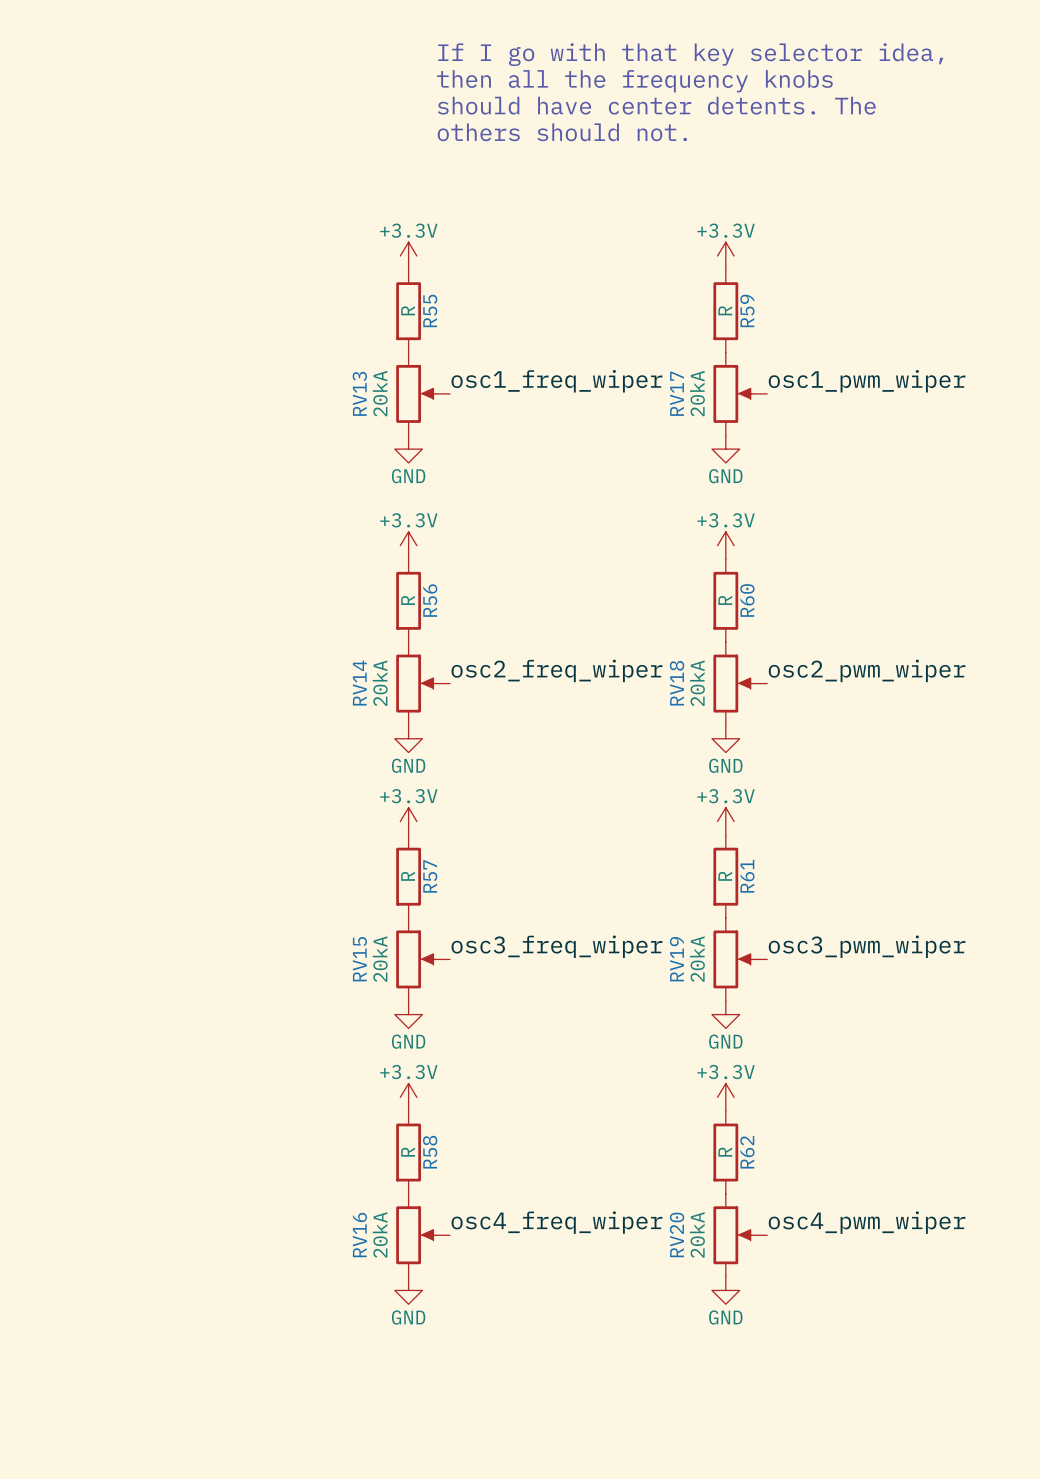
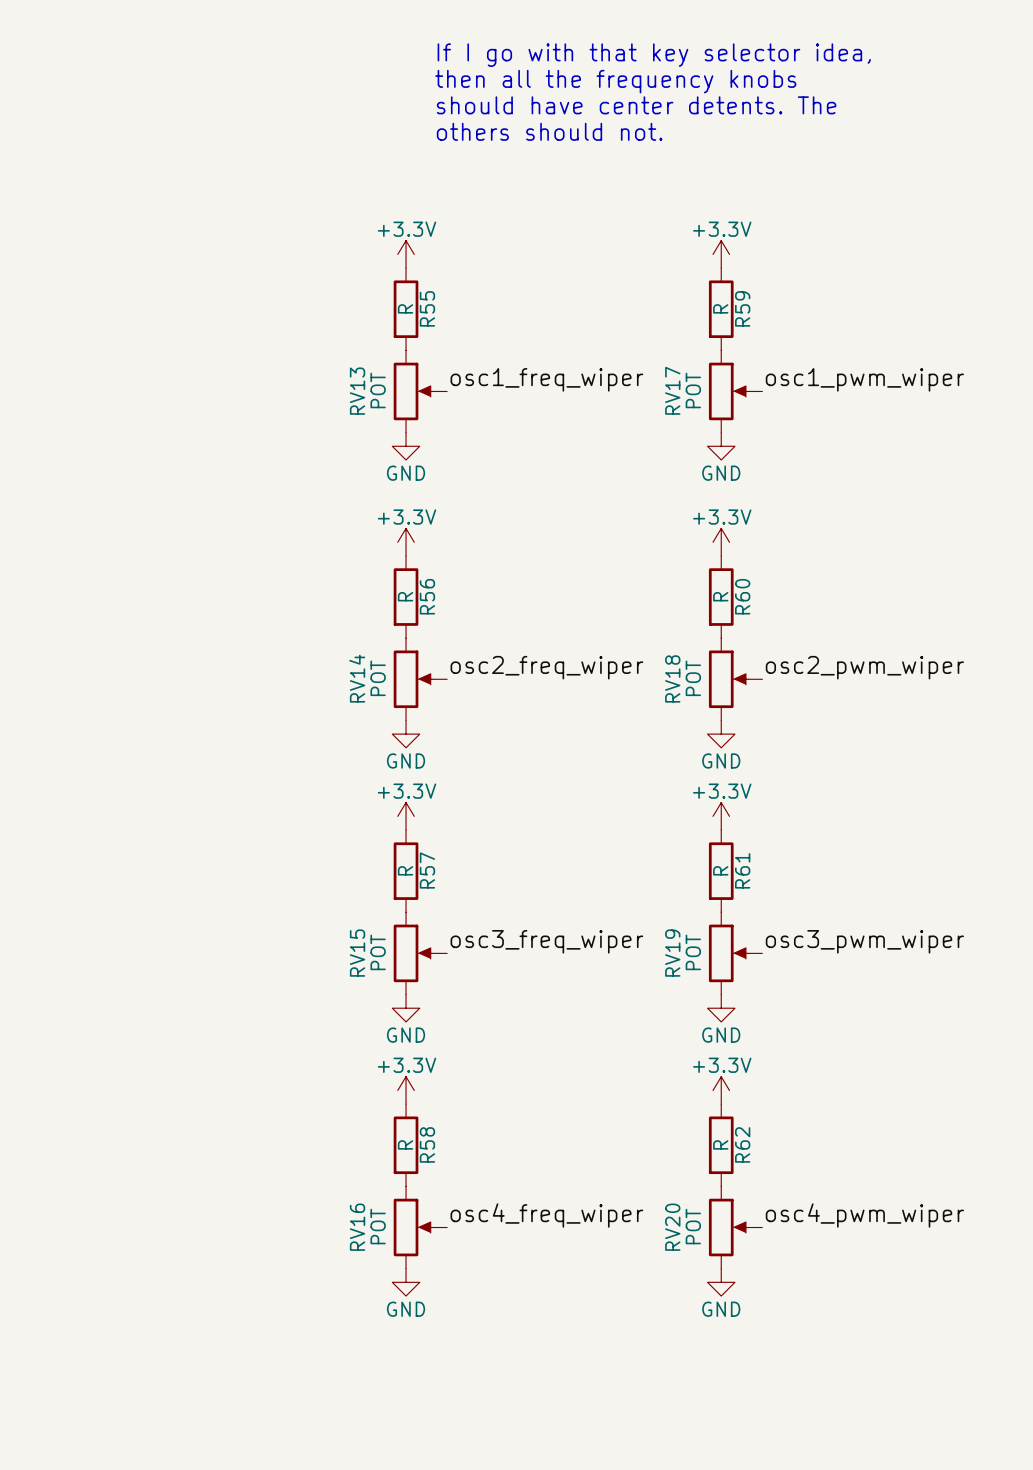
RV13 value: 20kA (380, 393) -> POT (378, 390)
RV17 value: 20kA (697, 393) -> POT (693, 390)
RV14 value: 20kA (380, 683) -> POT (378, 678)
RV18 value: 20kA (697, 683) -> POT (693, 678)
RV15 value: 20kA (380, 959) -> POT (378, 952)
RV19 value: 20kA (697, 959) -> POT (693, 952)
RV16 value: 20kA (380, 1234) -> POT (378, 1226)
RV20 value: 20kA (697, 1234) -> POT (693, 1226)

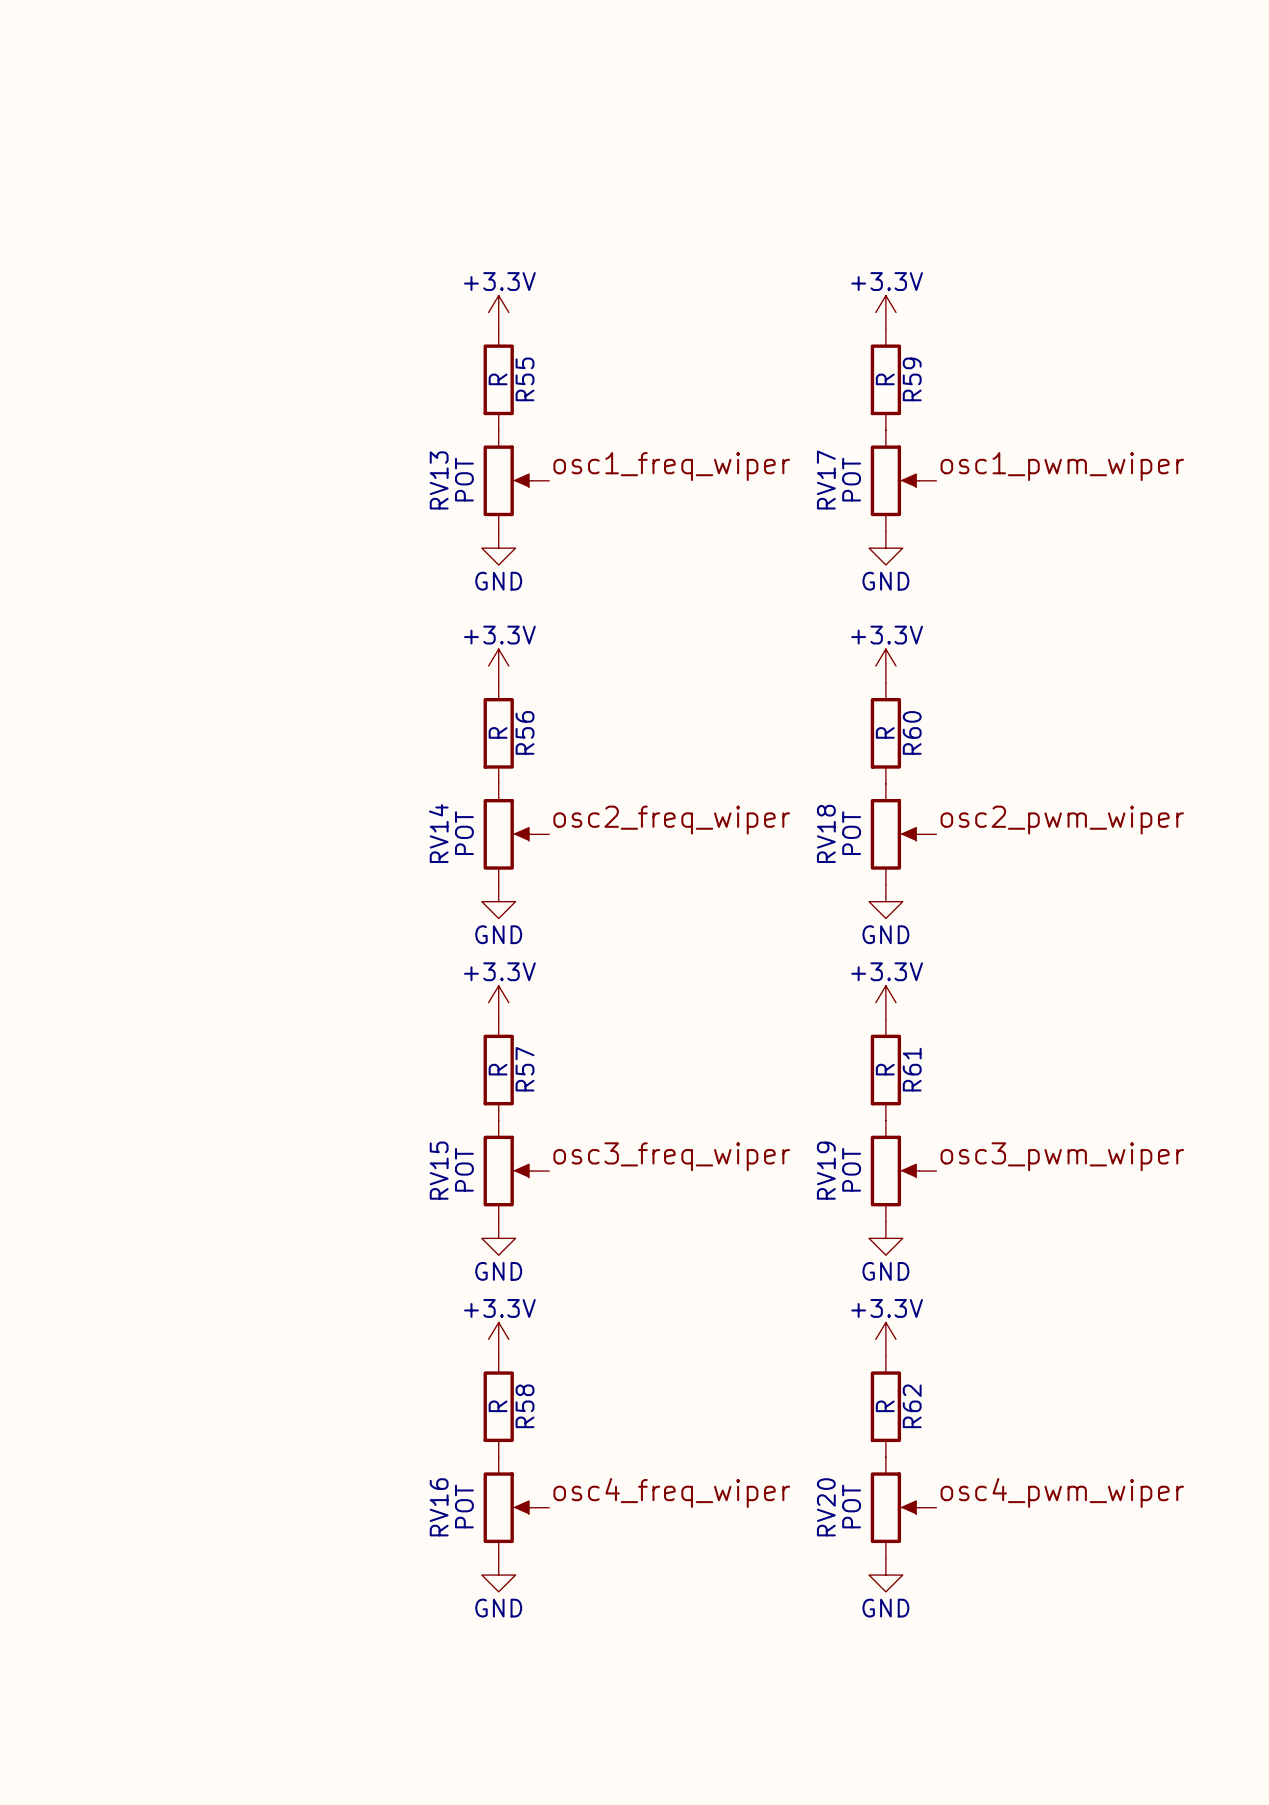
text: If I go with that key selector idea, (654, 55) -> none
text: then all the frequency knobs (615, 81) -> none
text: should have center detents. The (636, 105) -> none
text: others should not. (549, 131) -> none

